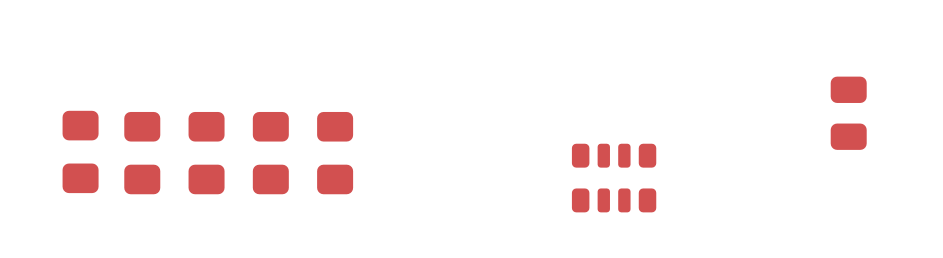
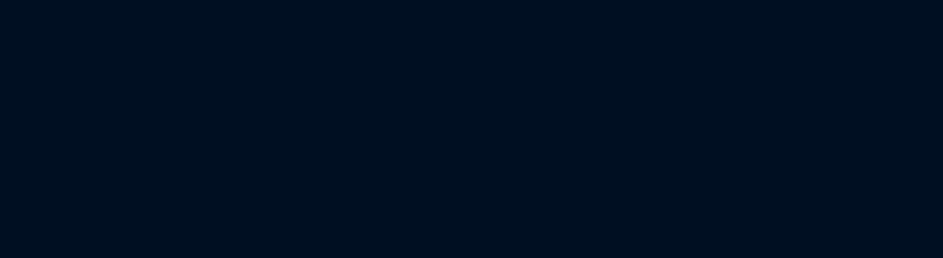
part: (848, 113) -> none
part: (80, 151) -> none
part: (142, 153) -> none
part: (206, 153) -> none
part: (270, 153) -> none
part: (335, 153) -> none
part: (614, 178) -> none

